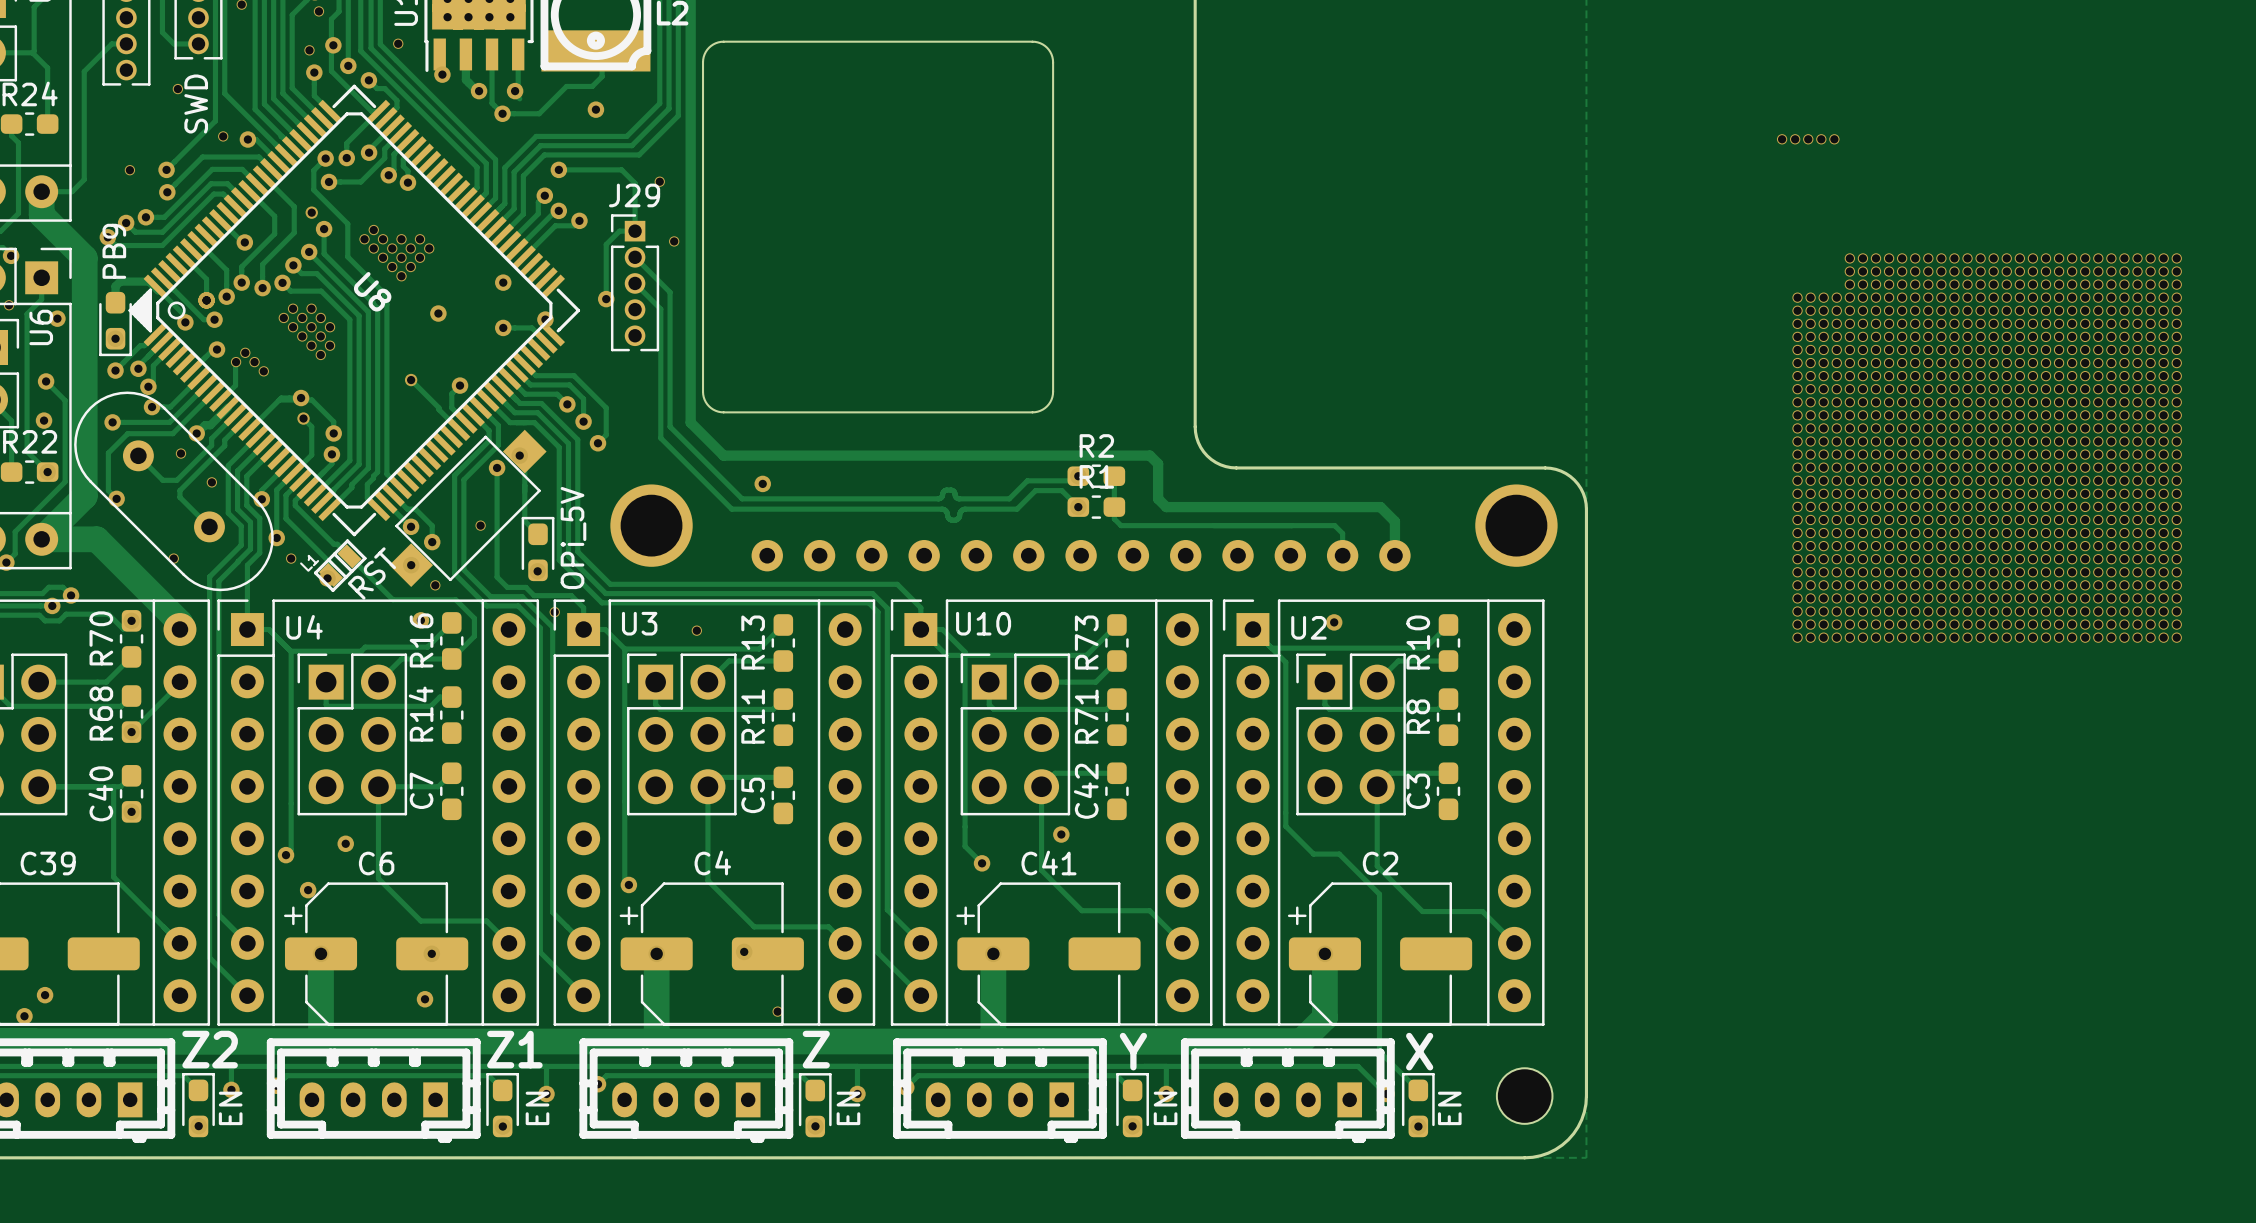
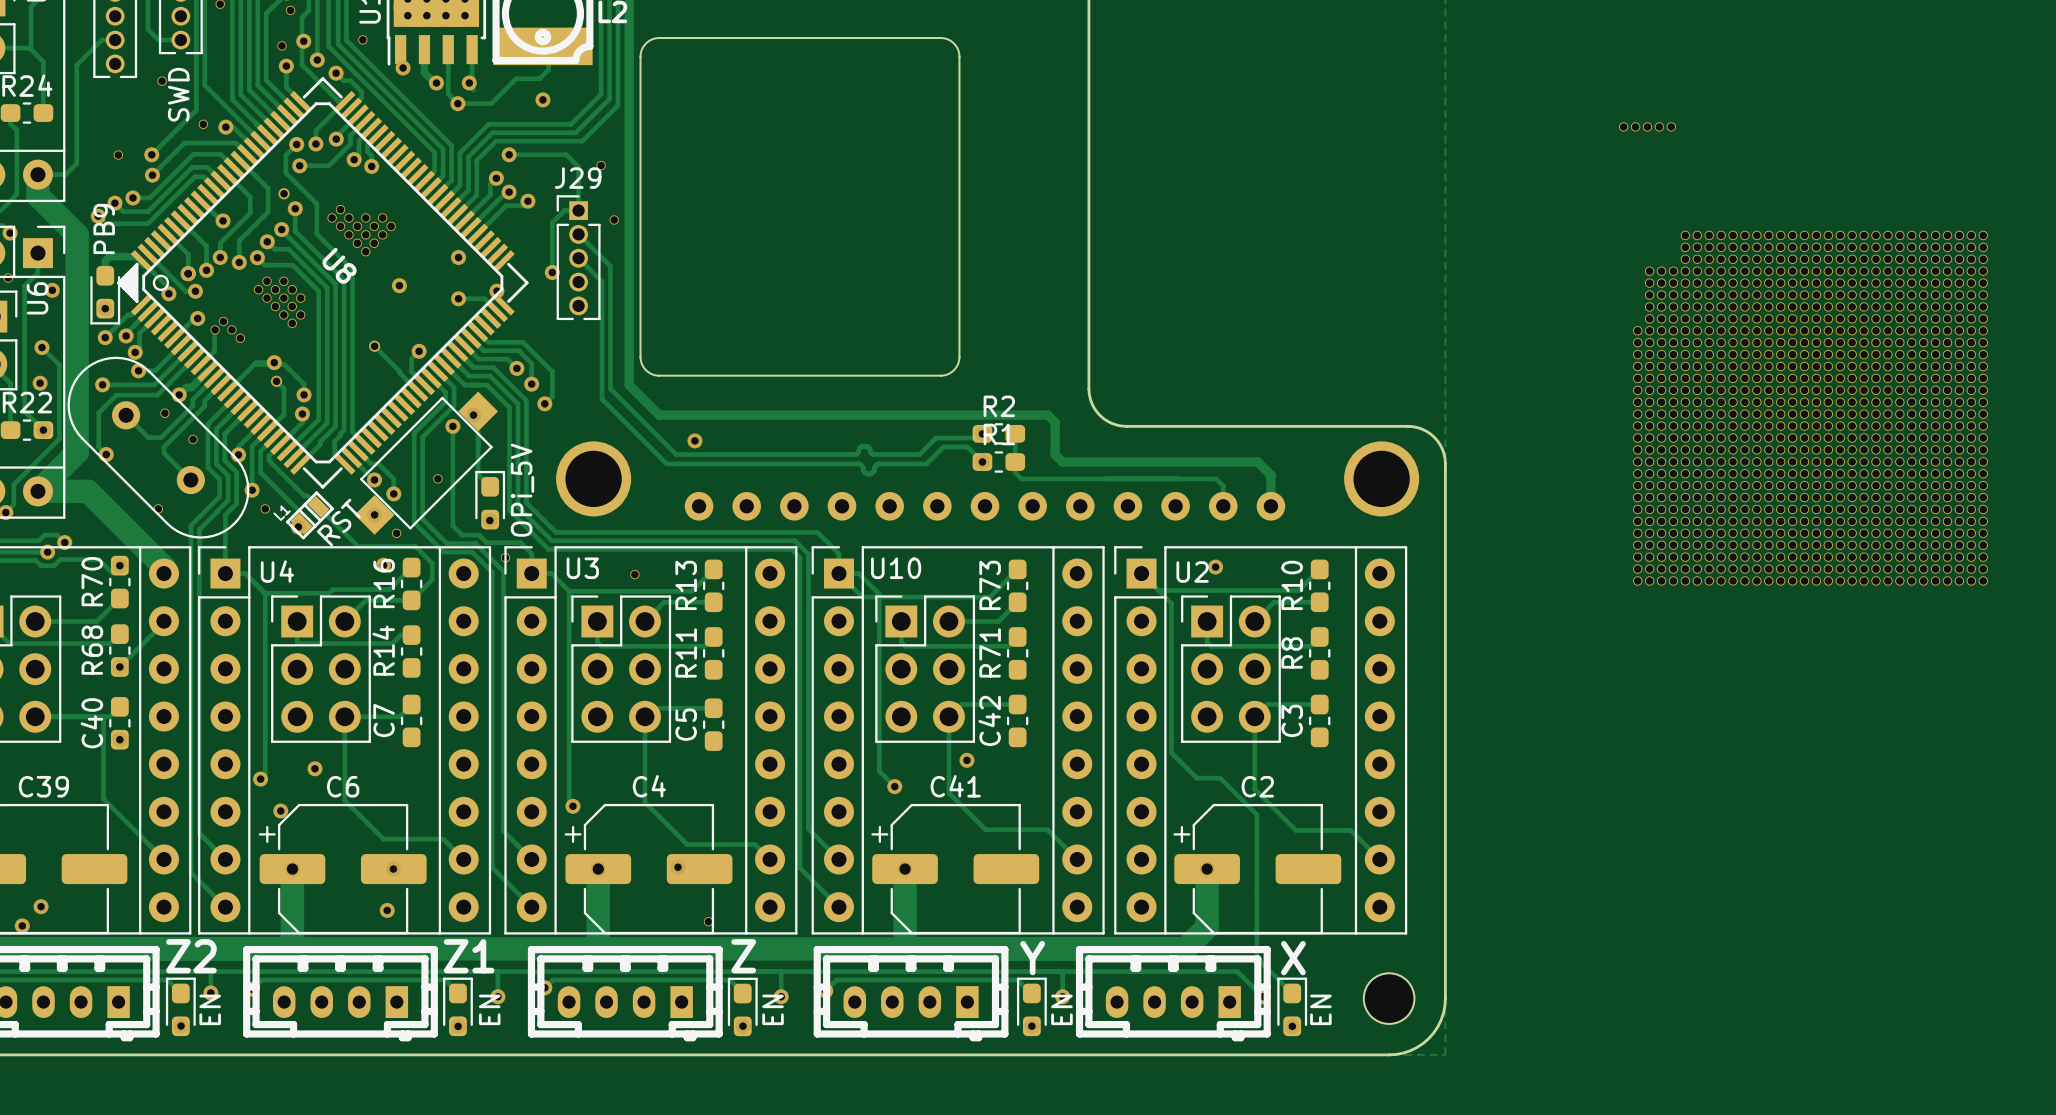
via: (1797, 297) -> none
via: (1797, 310) -> none
via: (1797, 323) -> none
via: (1797, 336) -> none
via: (1797, 349) -> none

